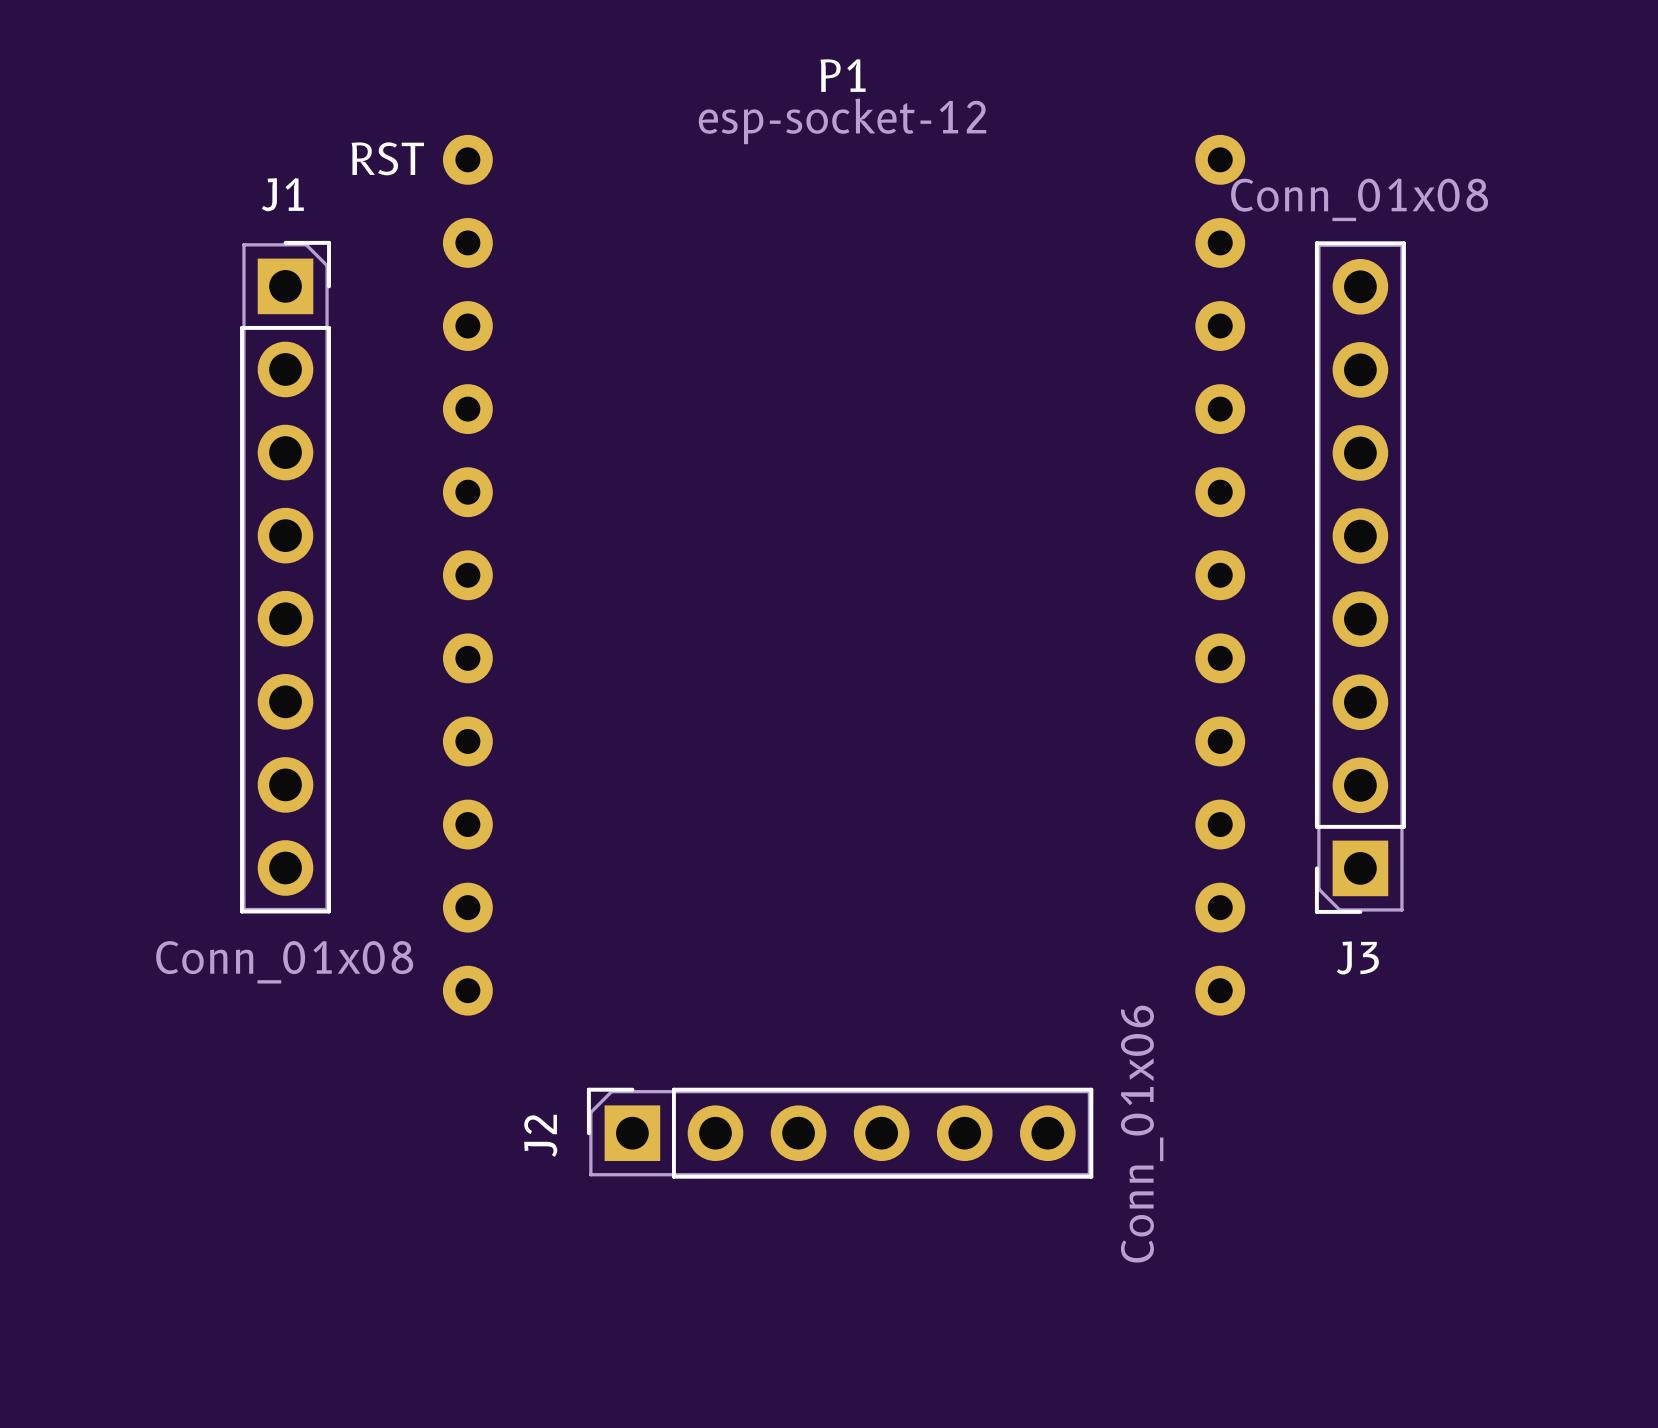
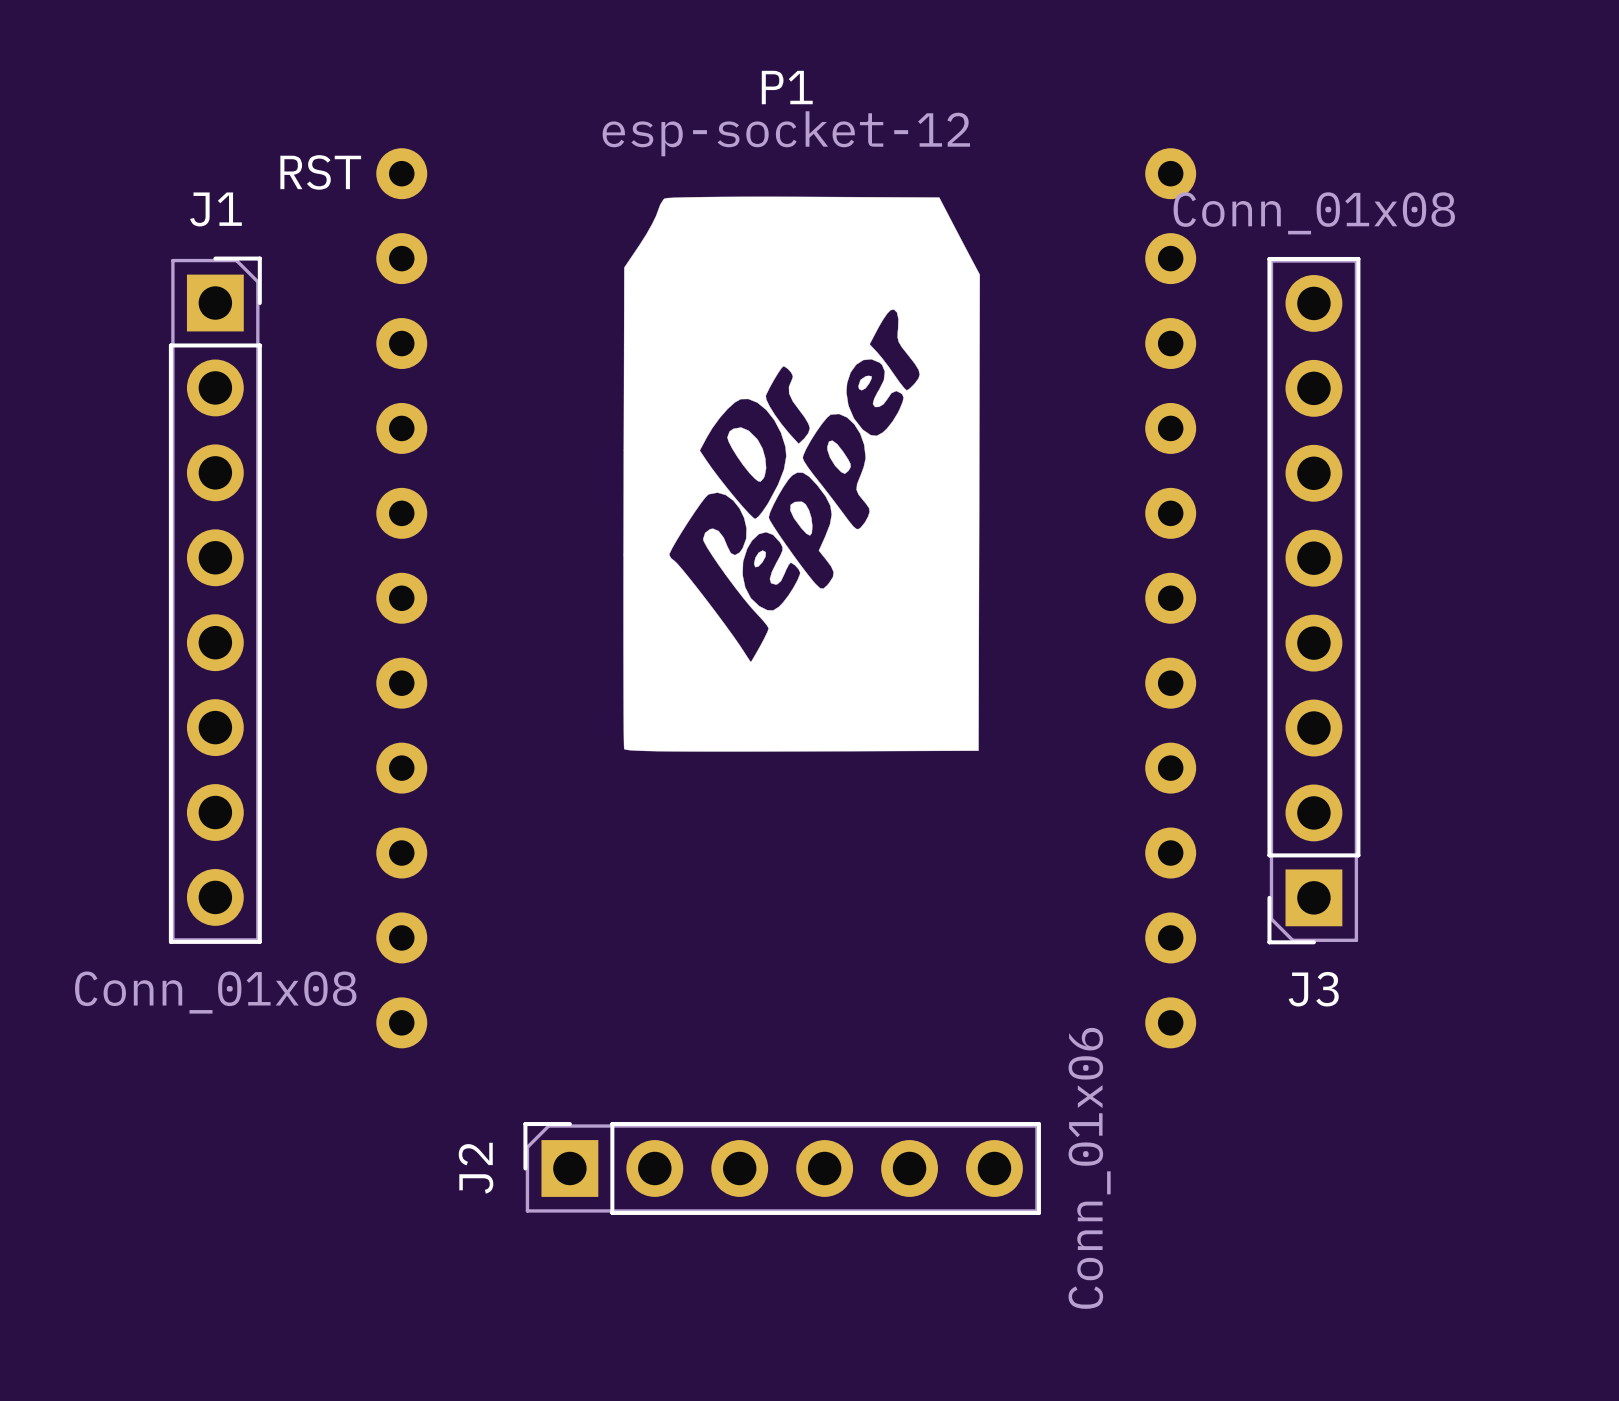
drawing: none -> [623, 196, 980, 752]

